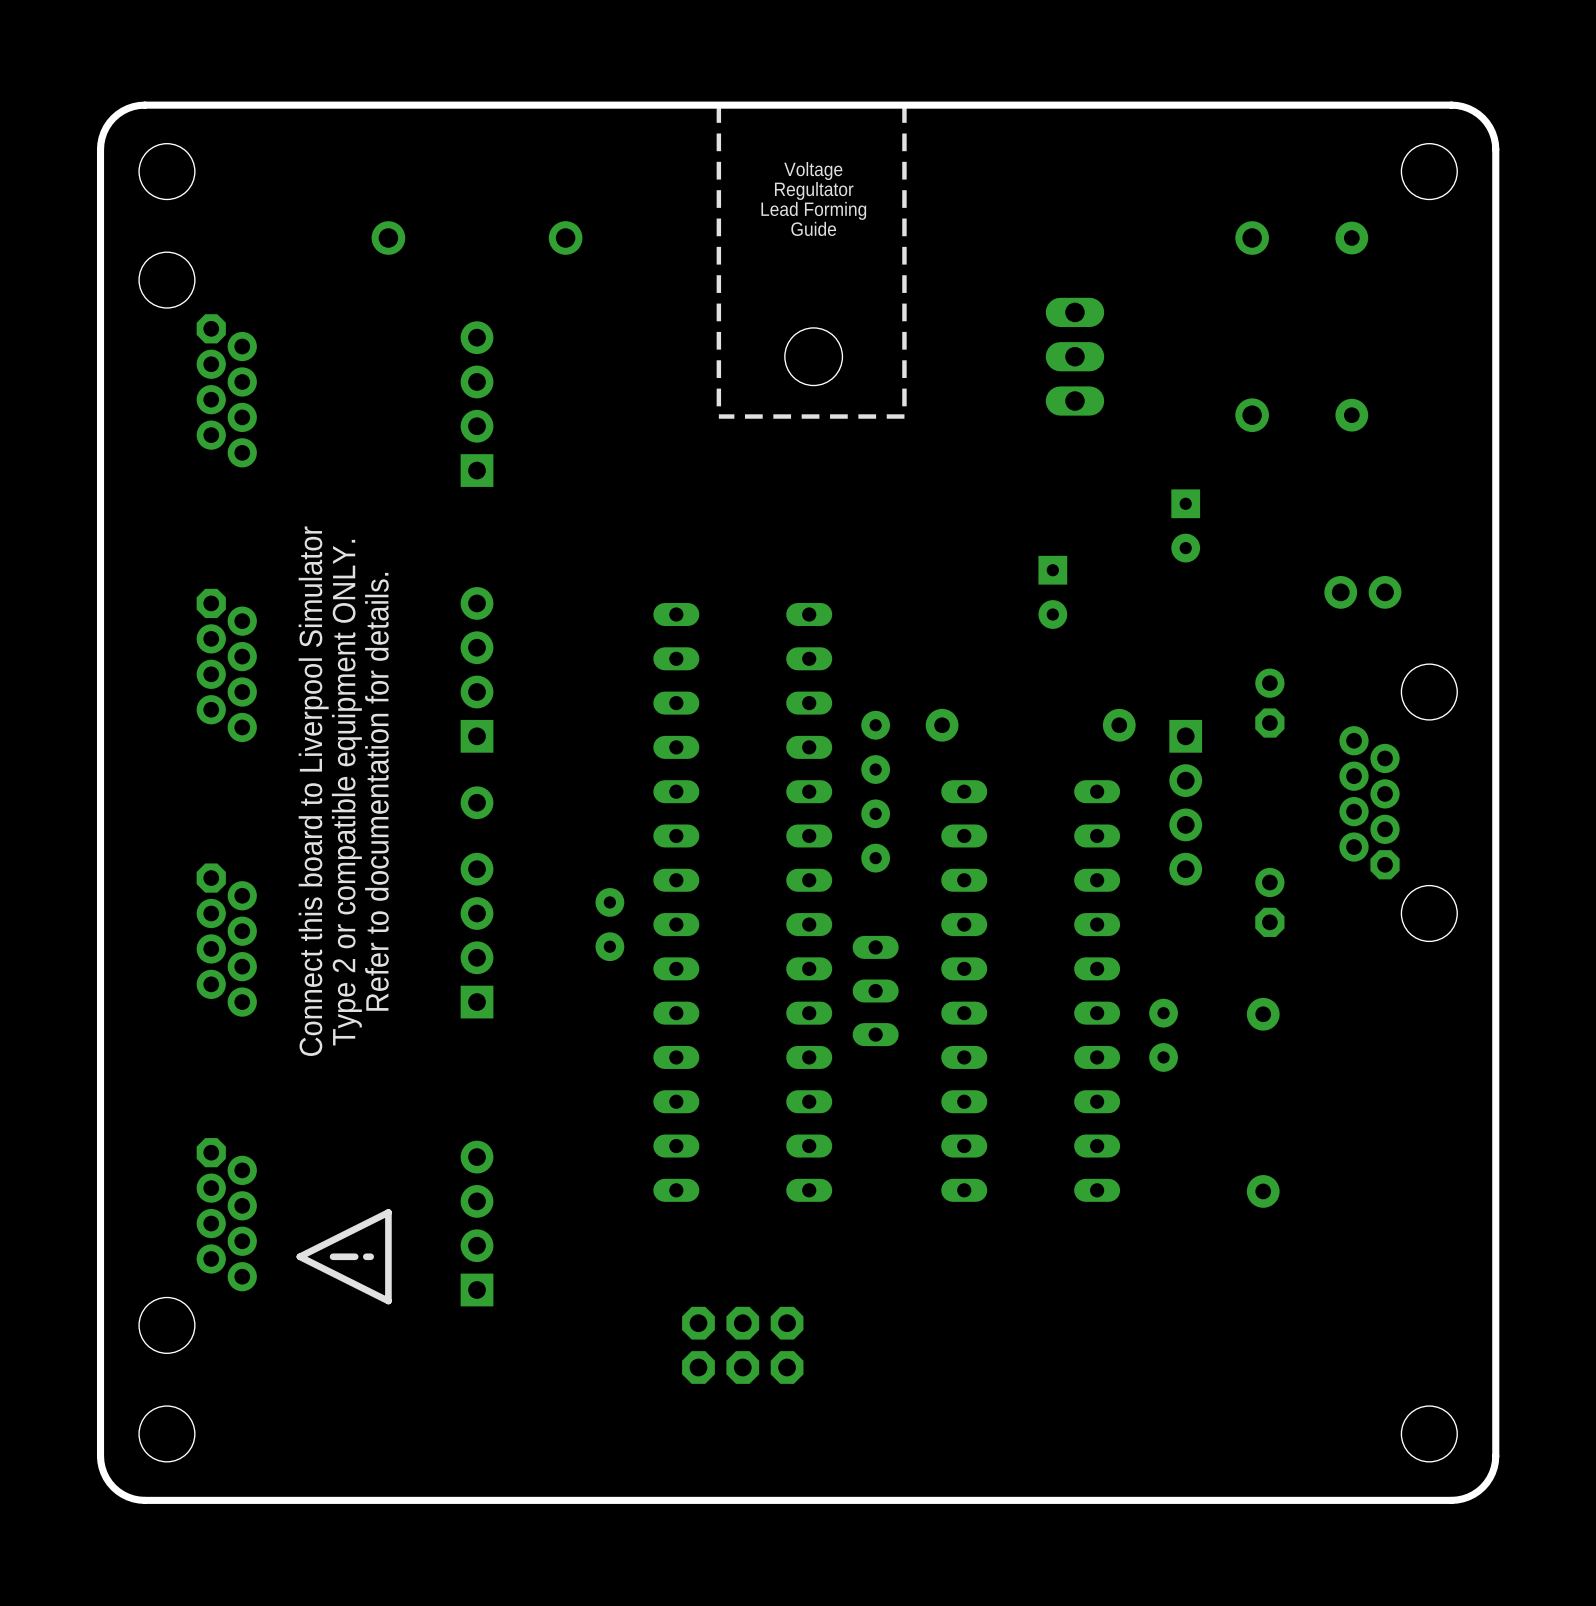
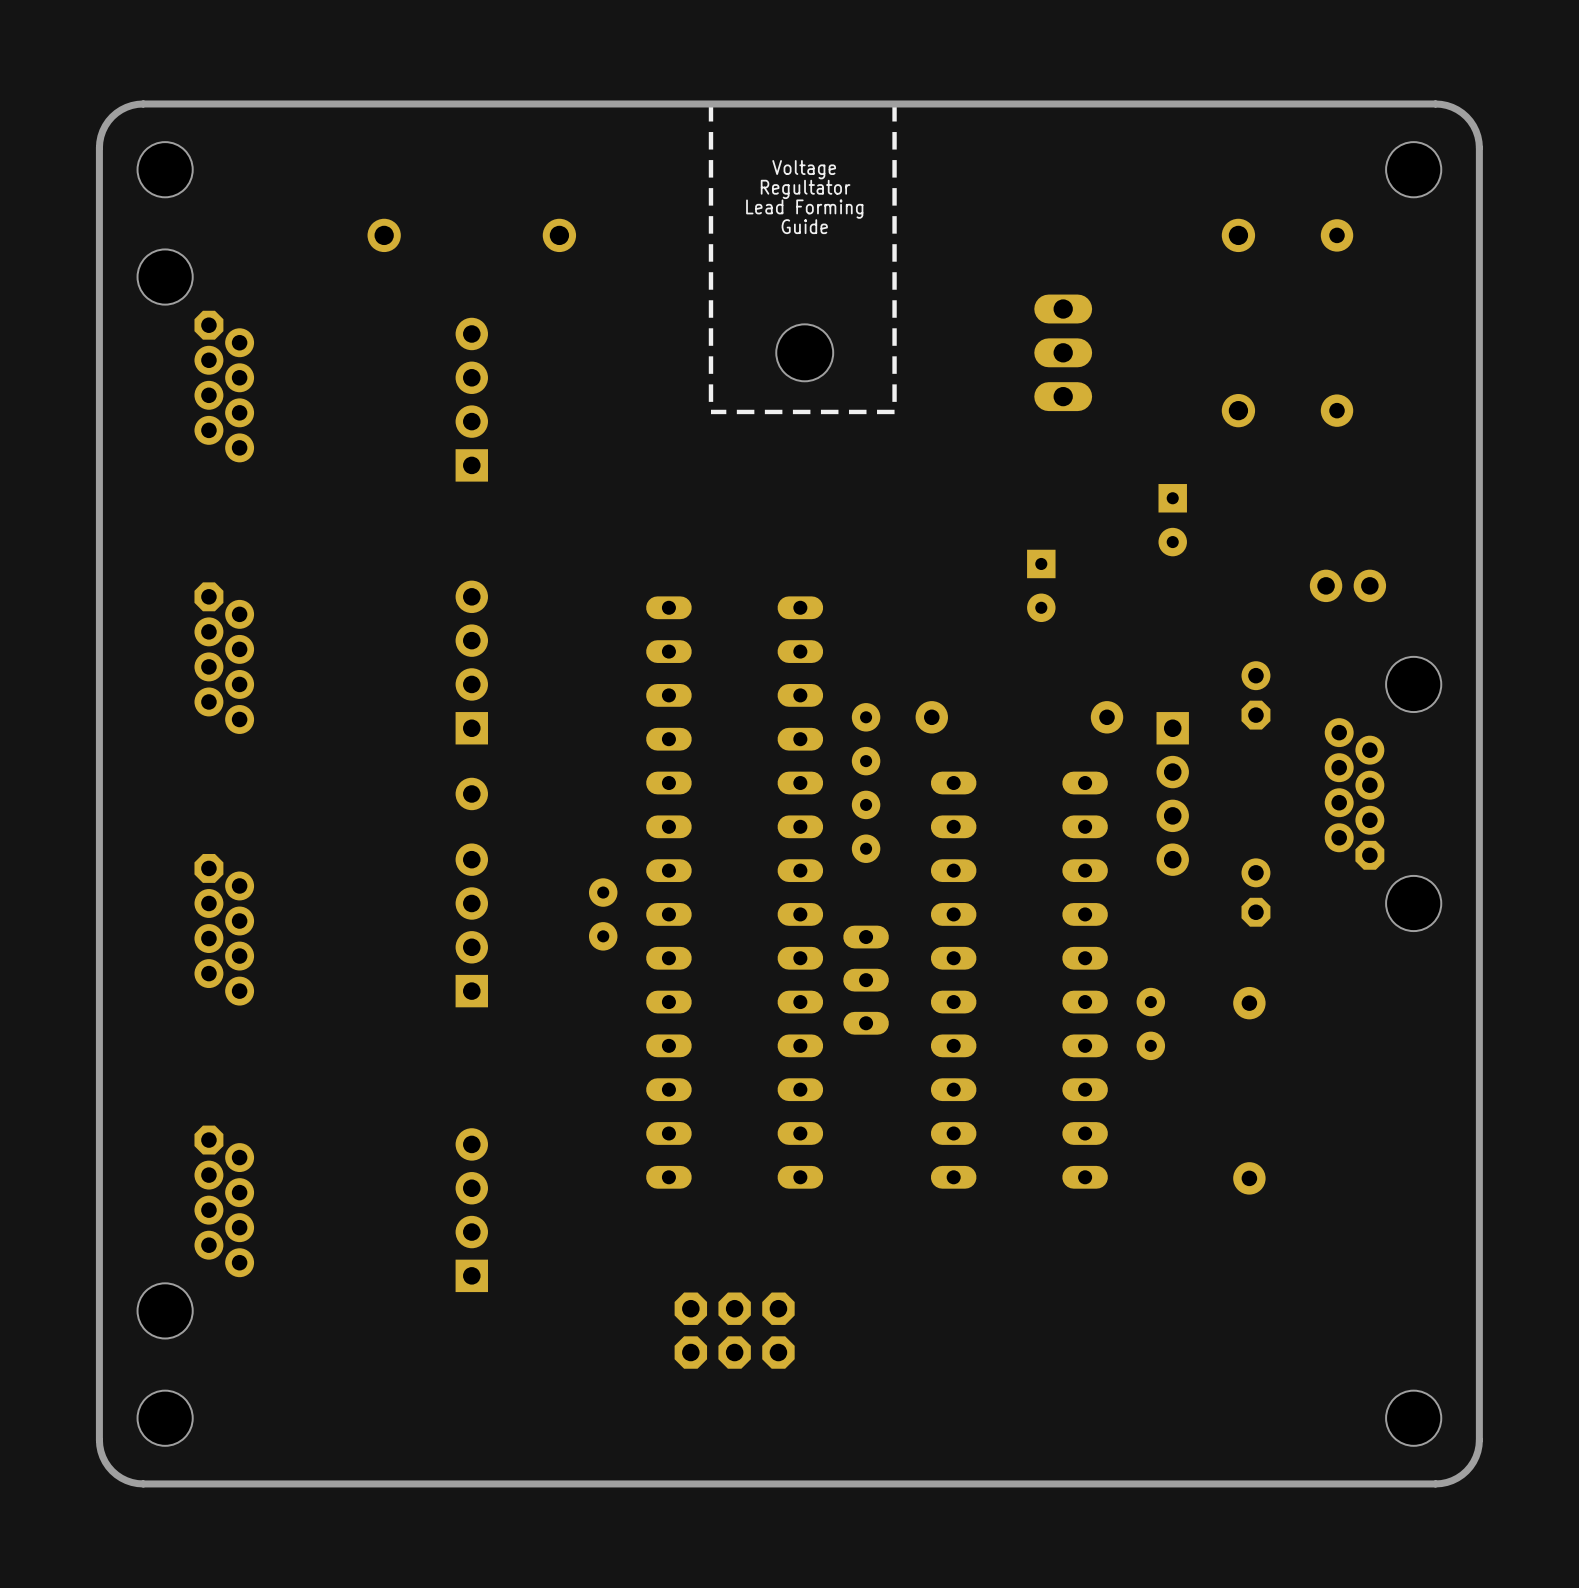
text: Connect this board to Liverpool Simulator (313, 791) -> none
text: Refer to documentation for details. (376, 791) -> none
text: Type 2 or compatible equipment ONLY. (346, 792) -> none
drawing: [296, 1209, 392, 1305] -> none

